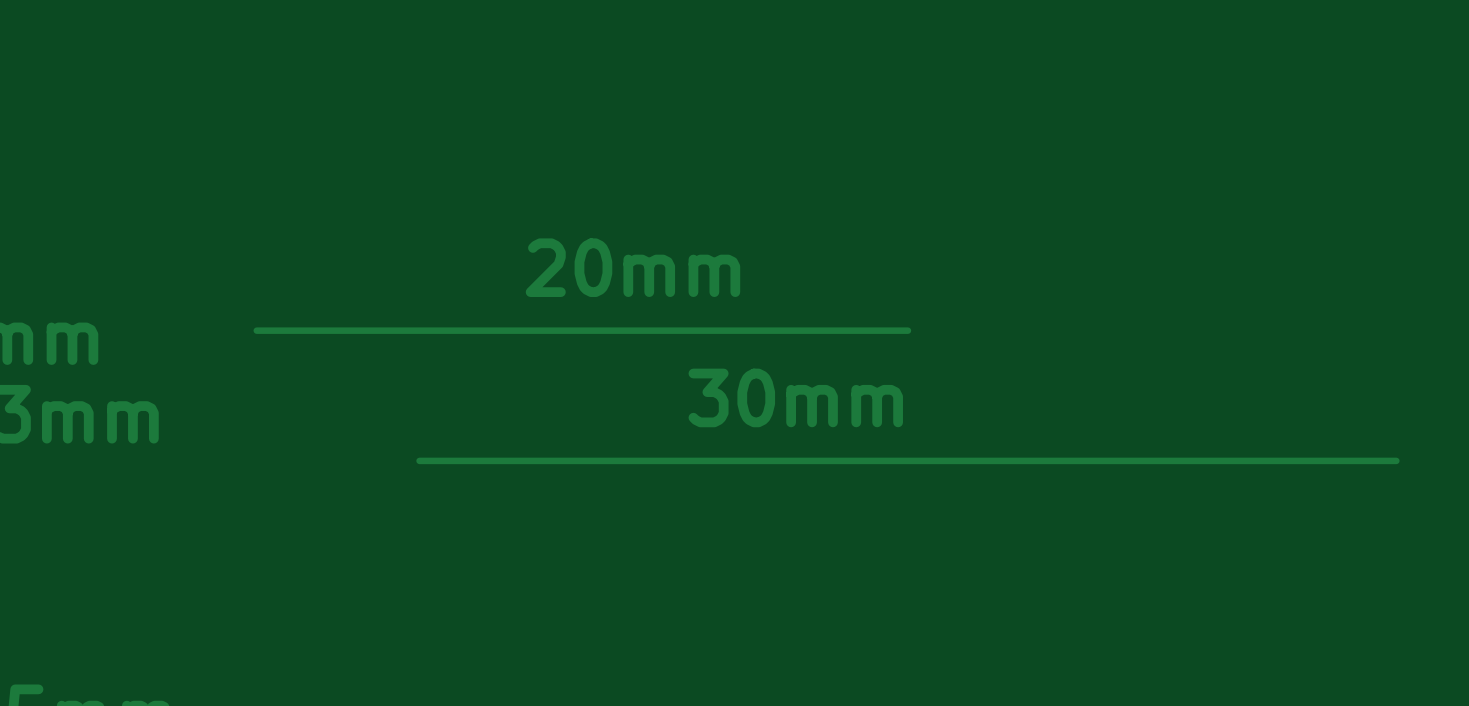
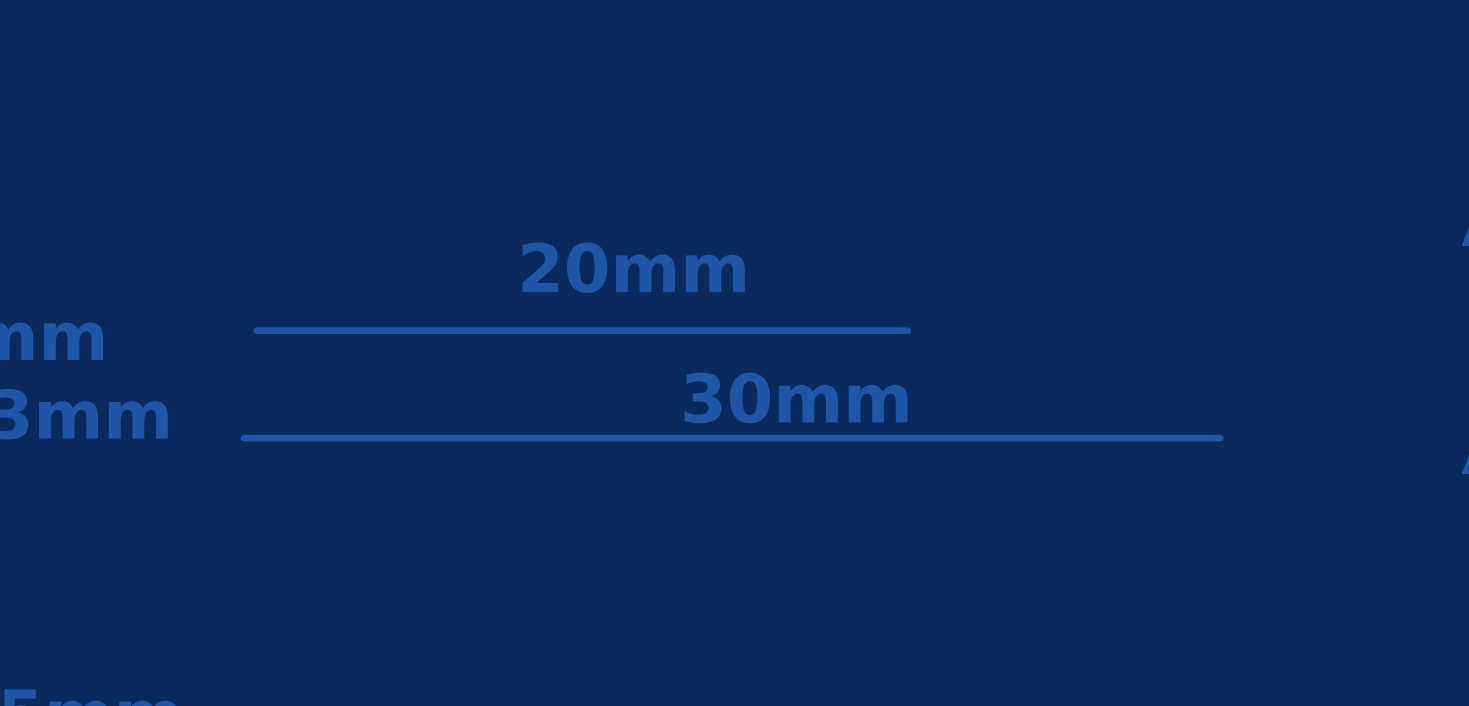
track: (419, 460) (1396, 460) -> (243, 438) (1220, 438)

